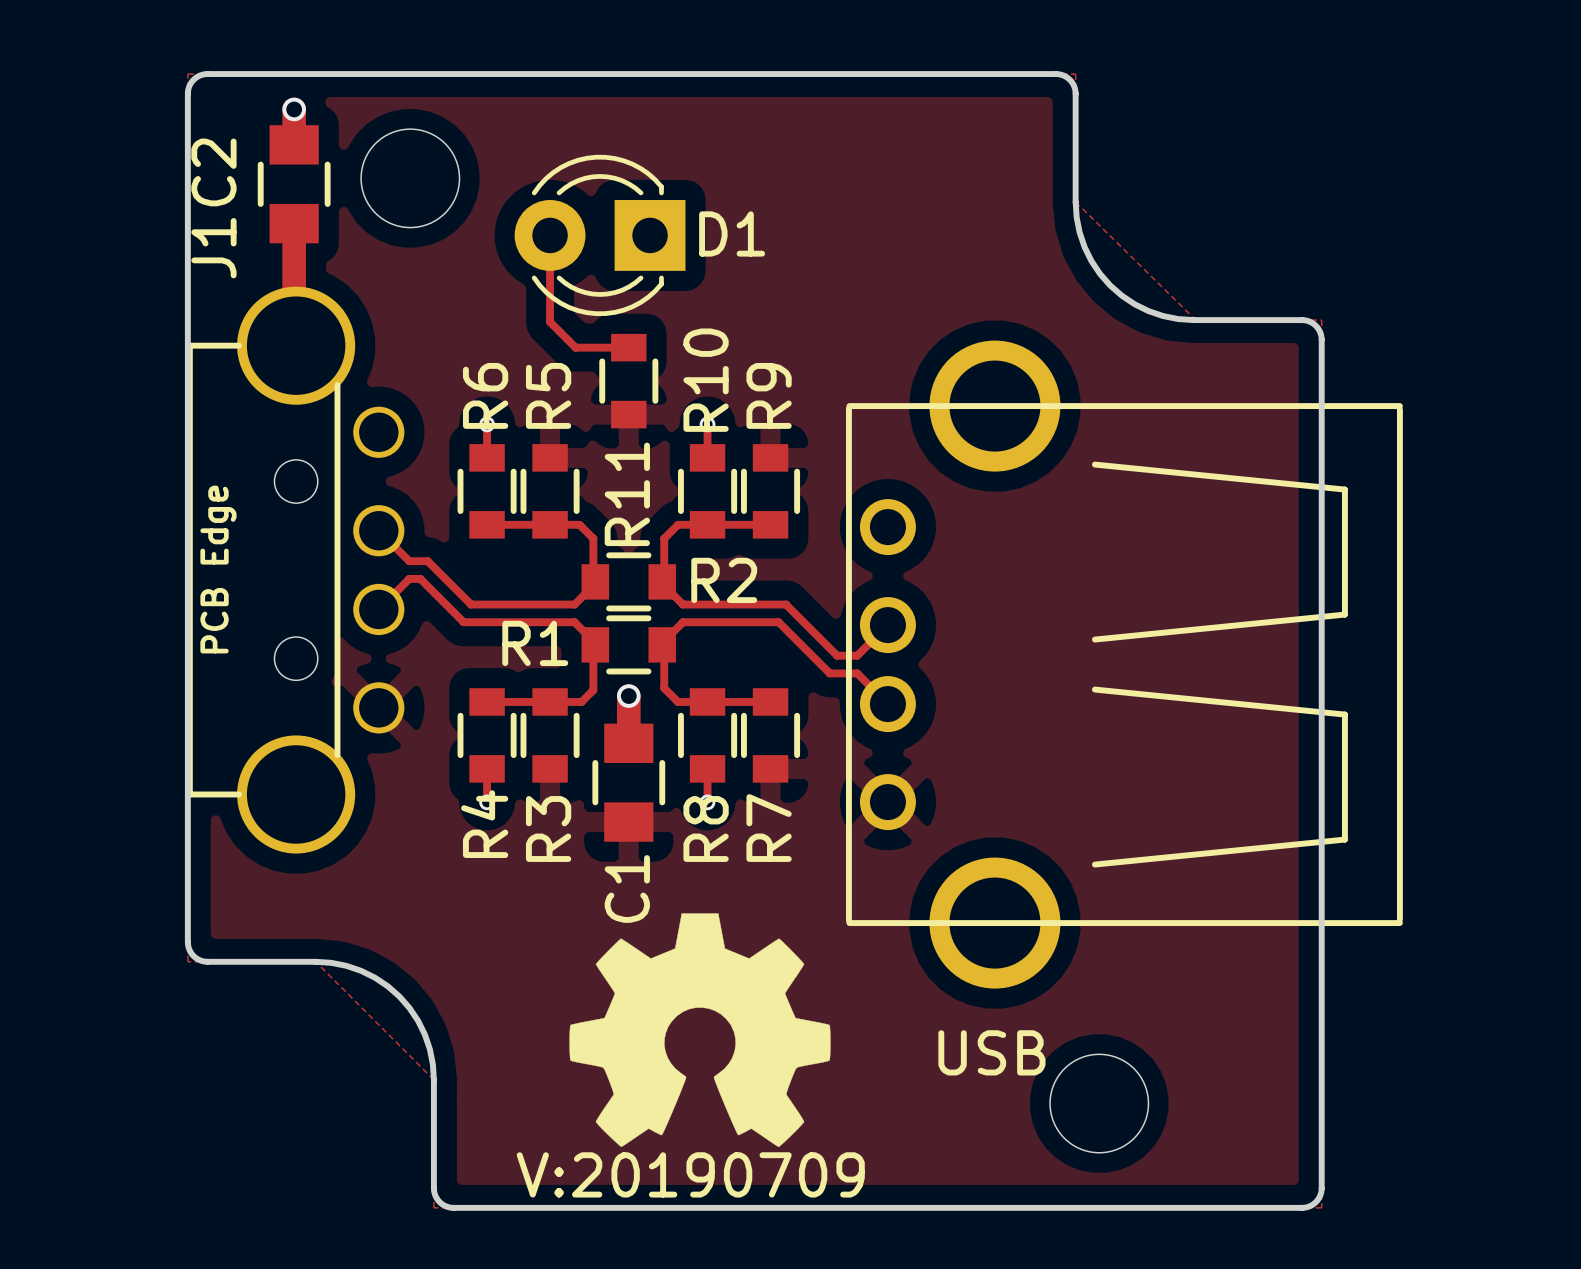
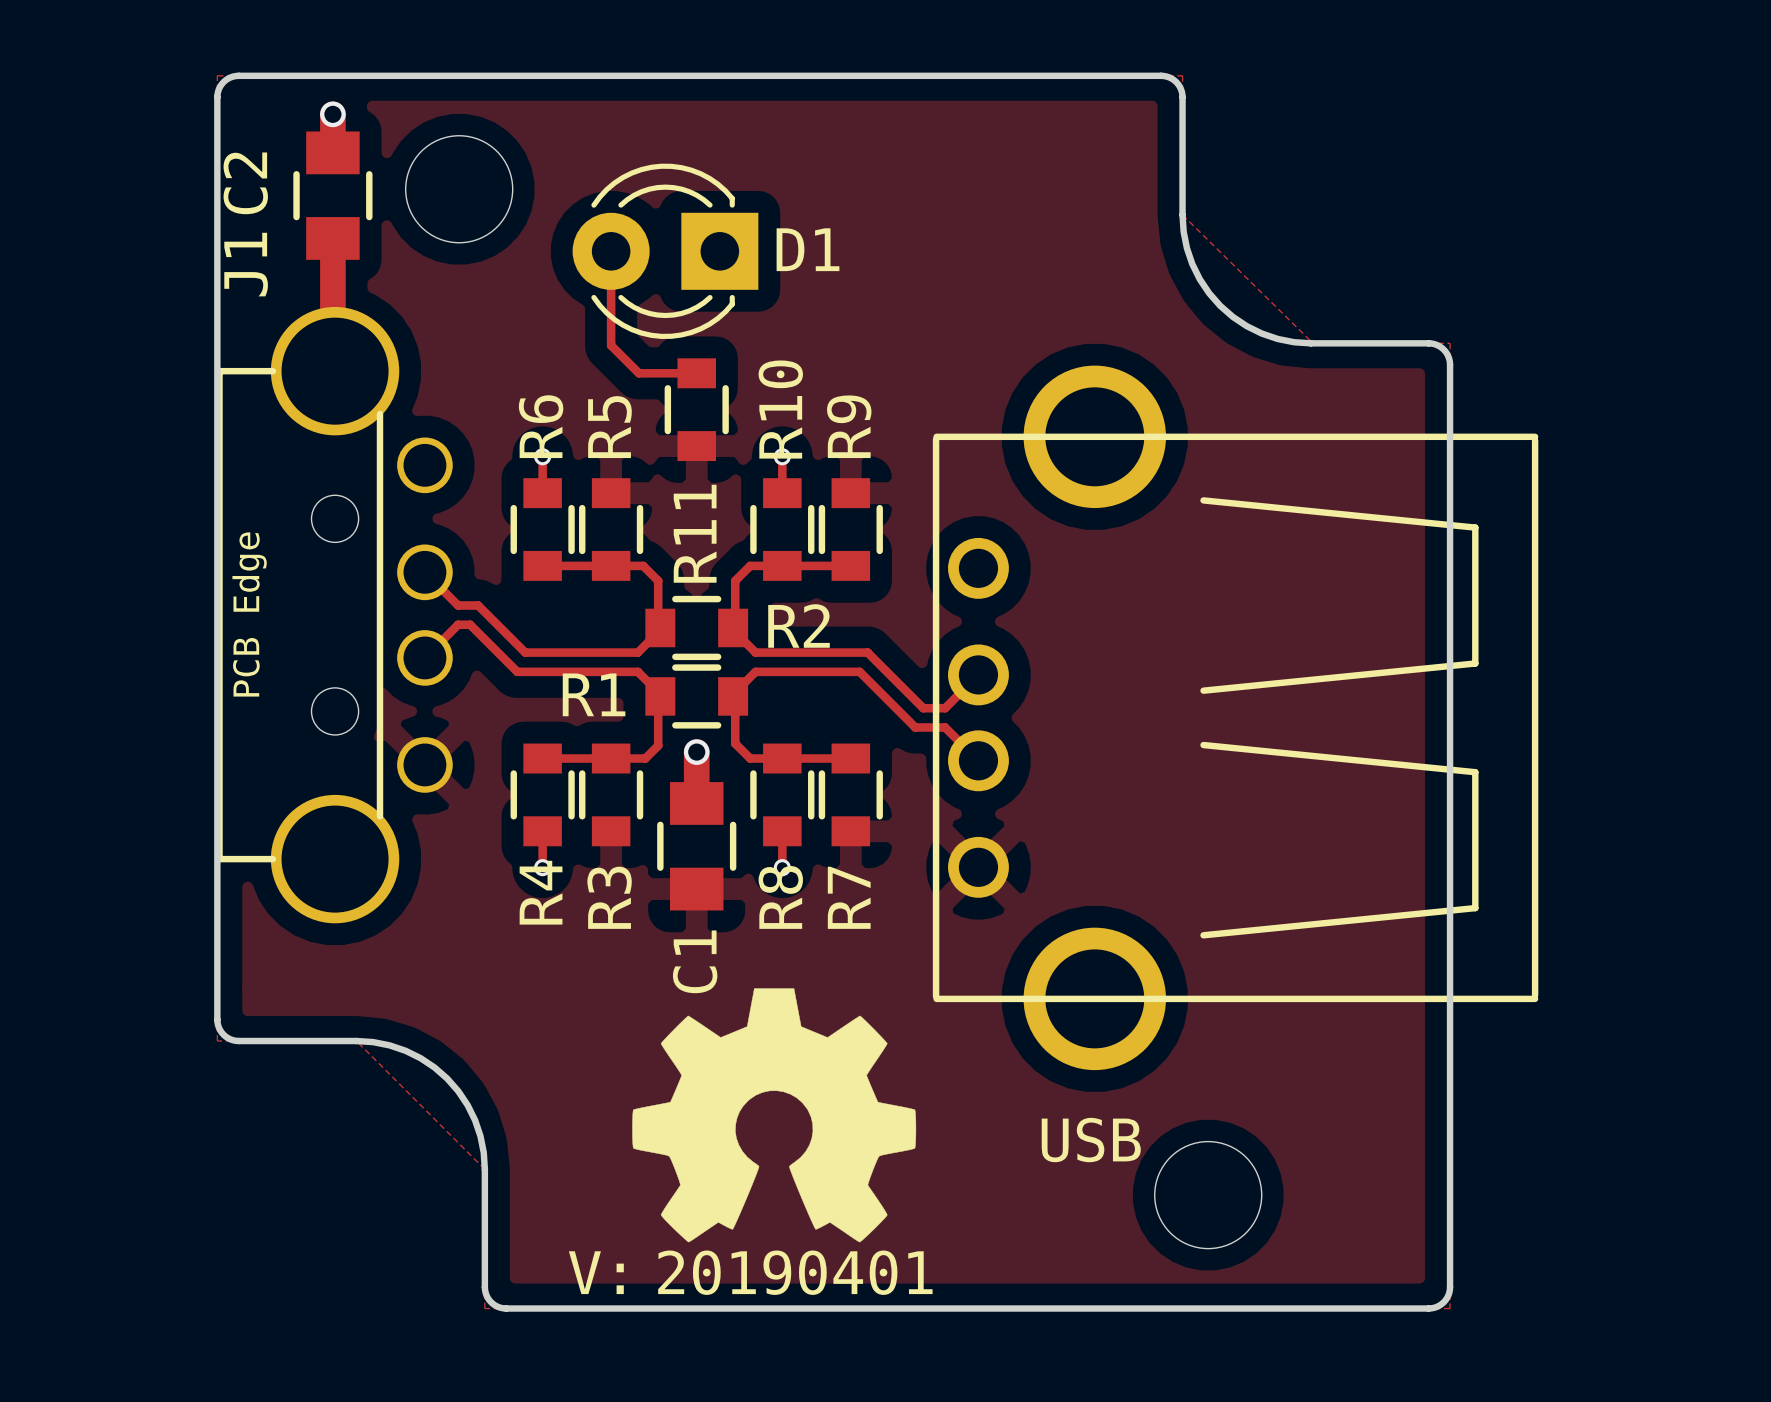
drawing shape: [516, 1152, 865, 1198] -> [568, 1250, 933, 1295]

